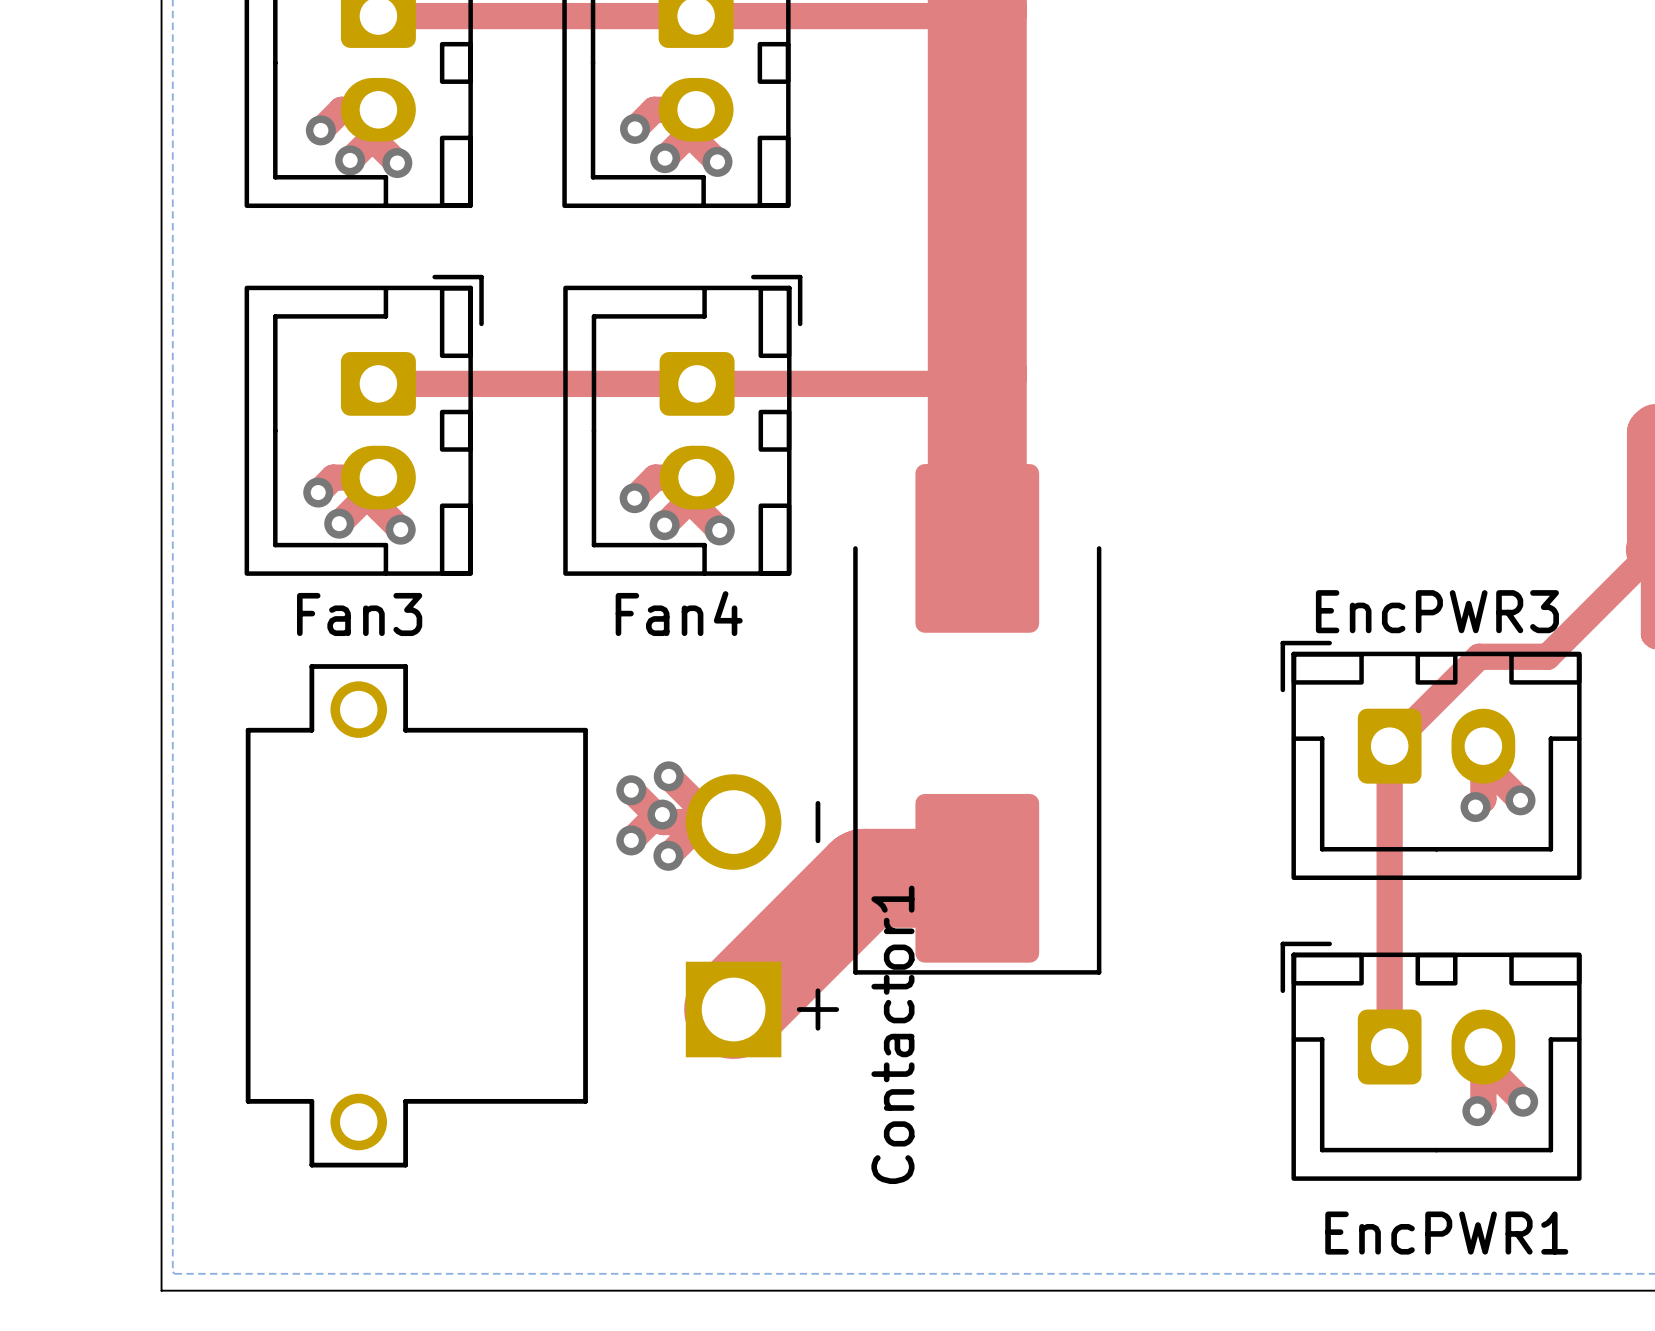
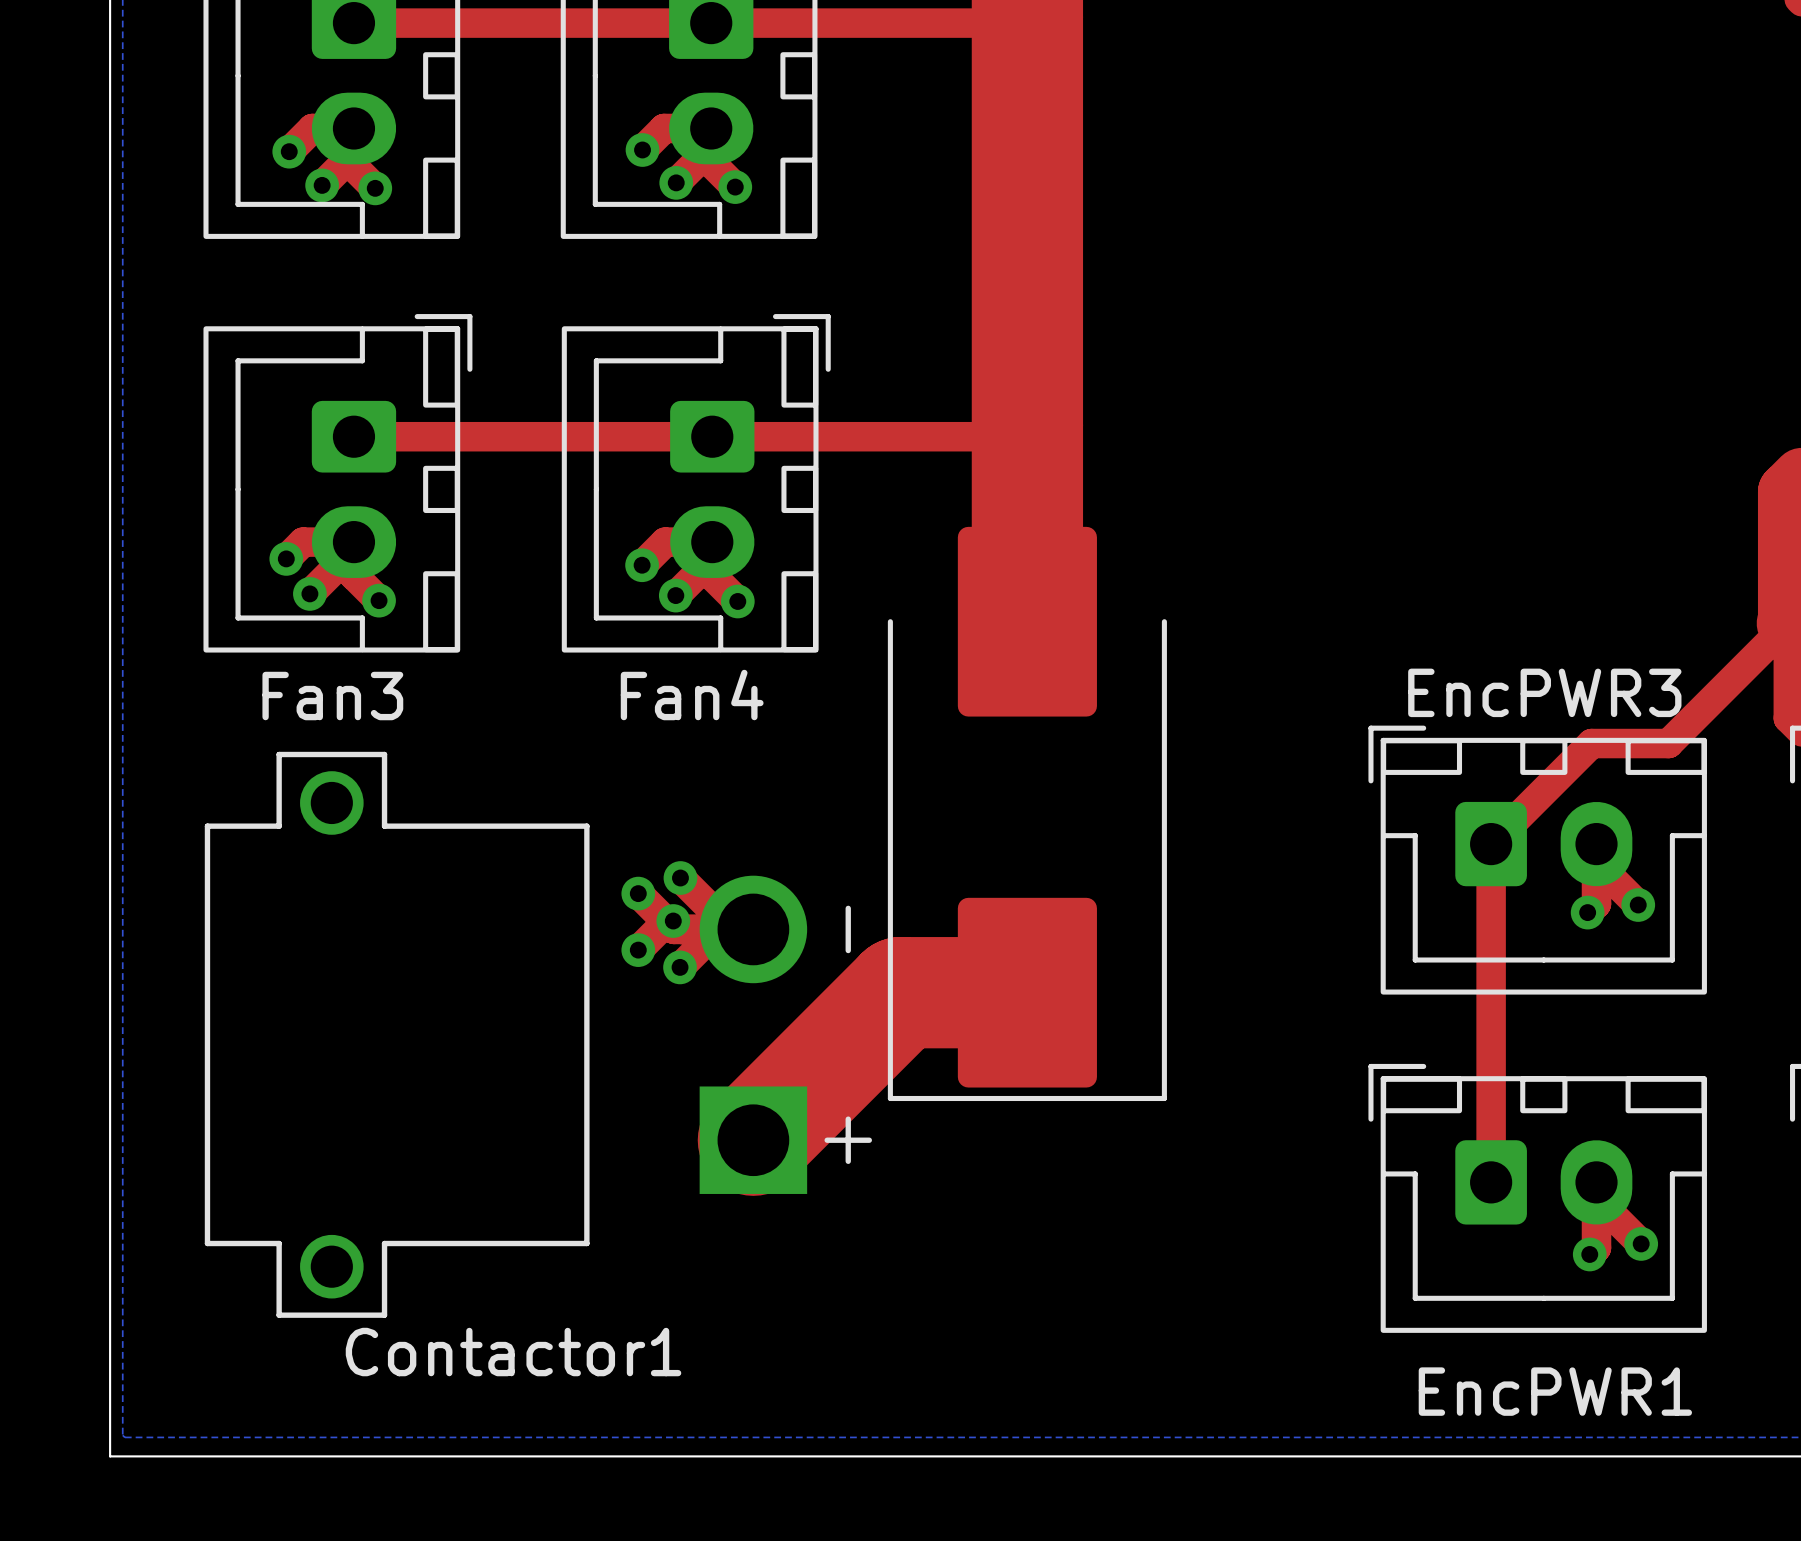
Contactor1 name rotation: 0° (892, 1034) -> 90° clockwise (513, 1352)
Contactor1 name position: Contactor1 (892, 1034) -> Contactor1 (513, 1352)

